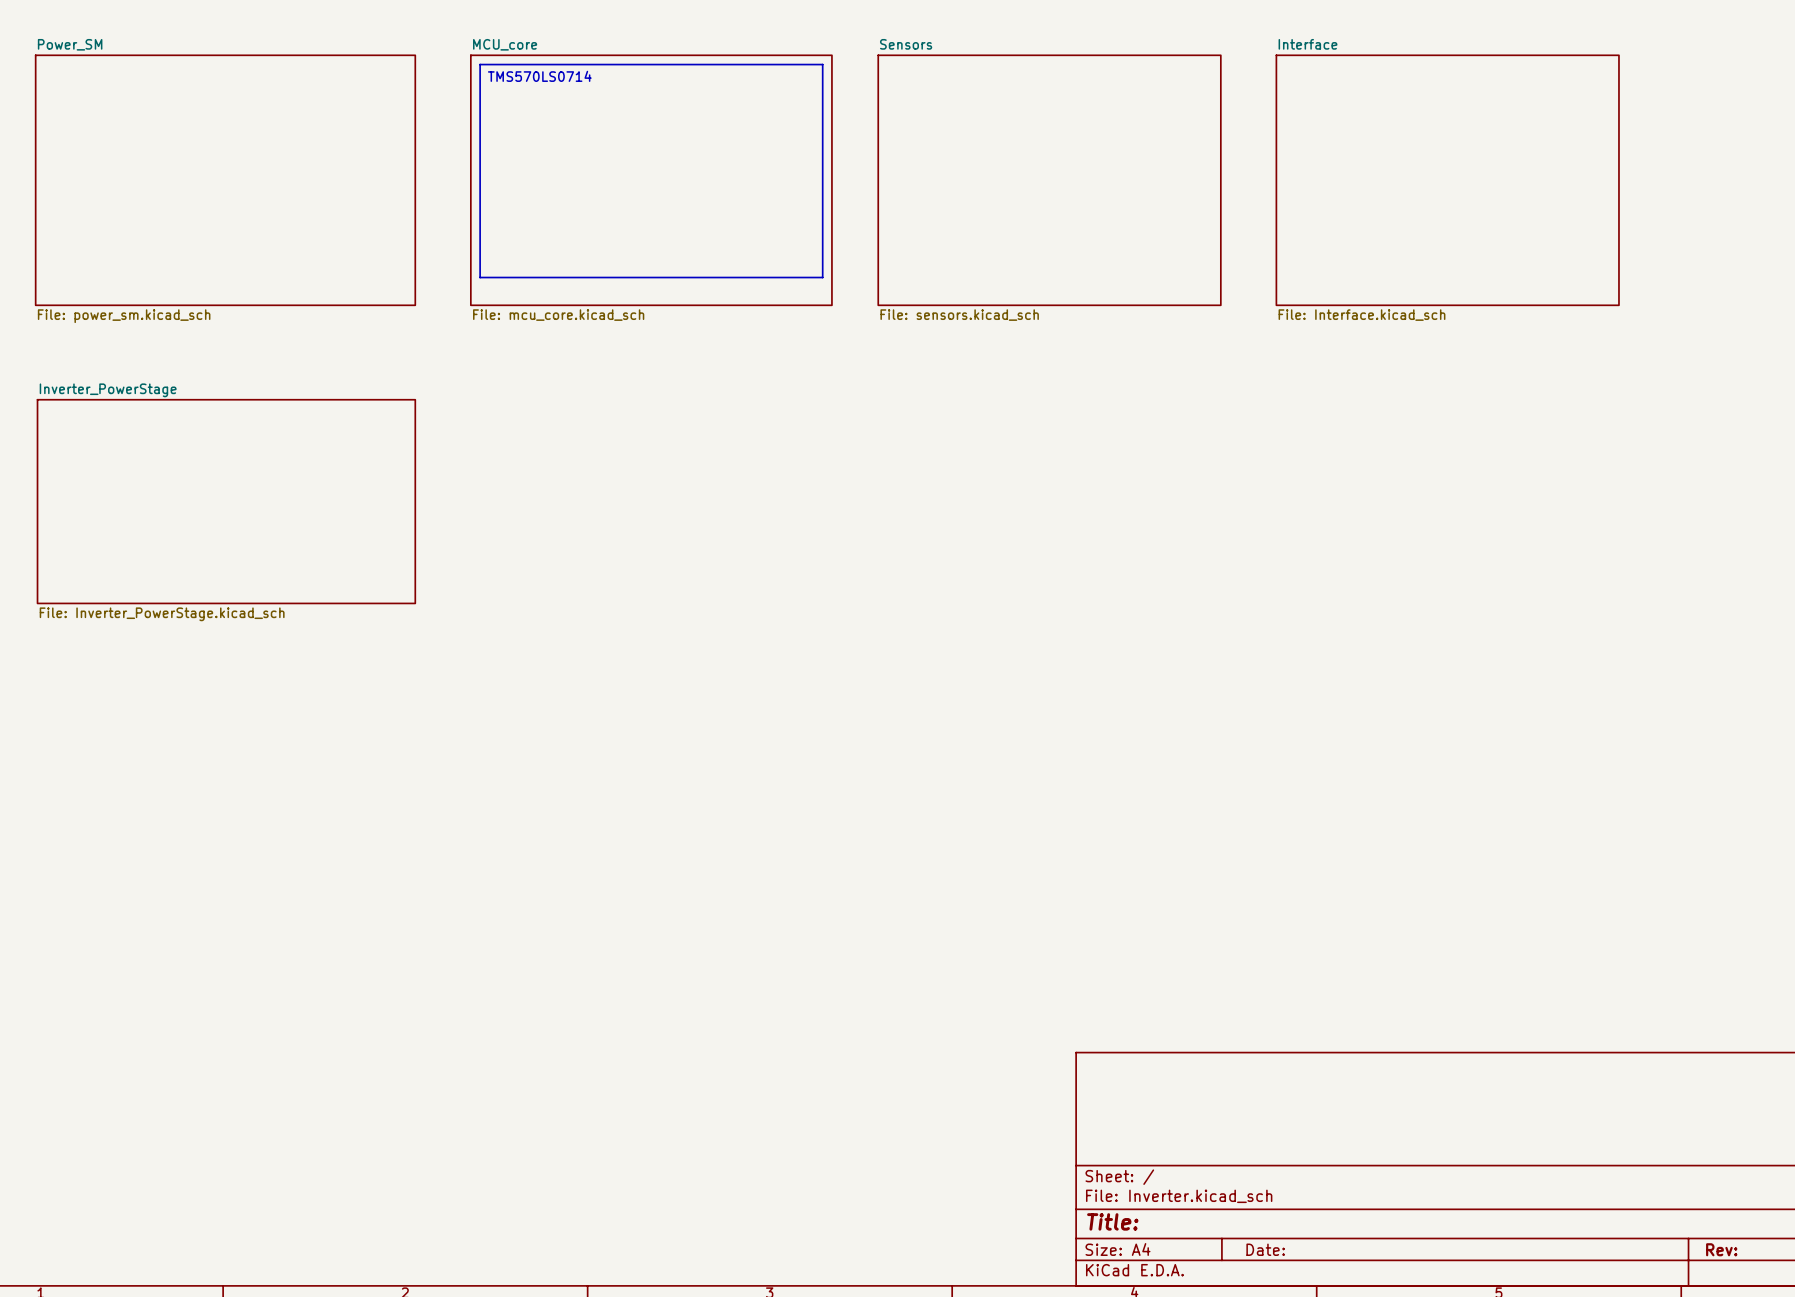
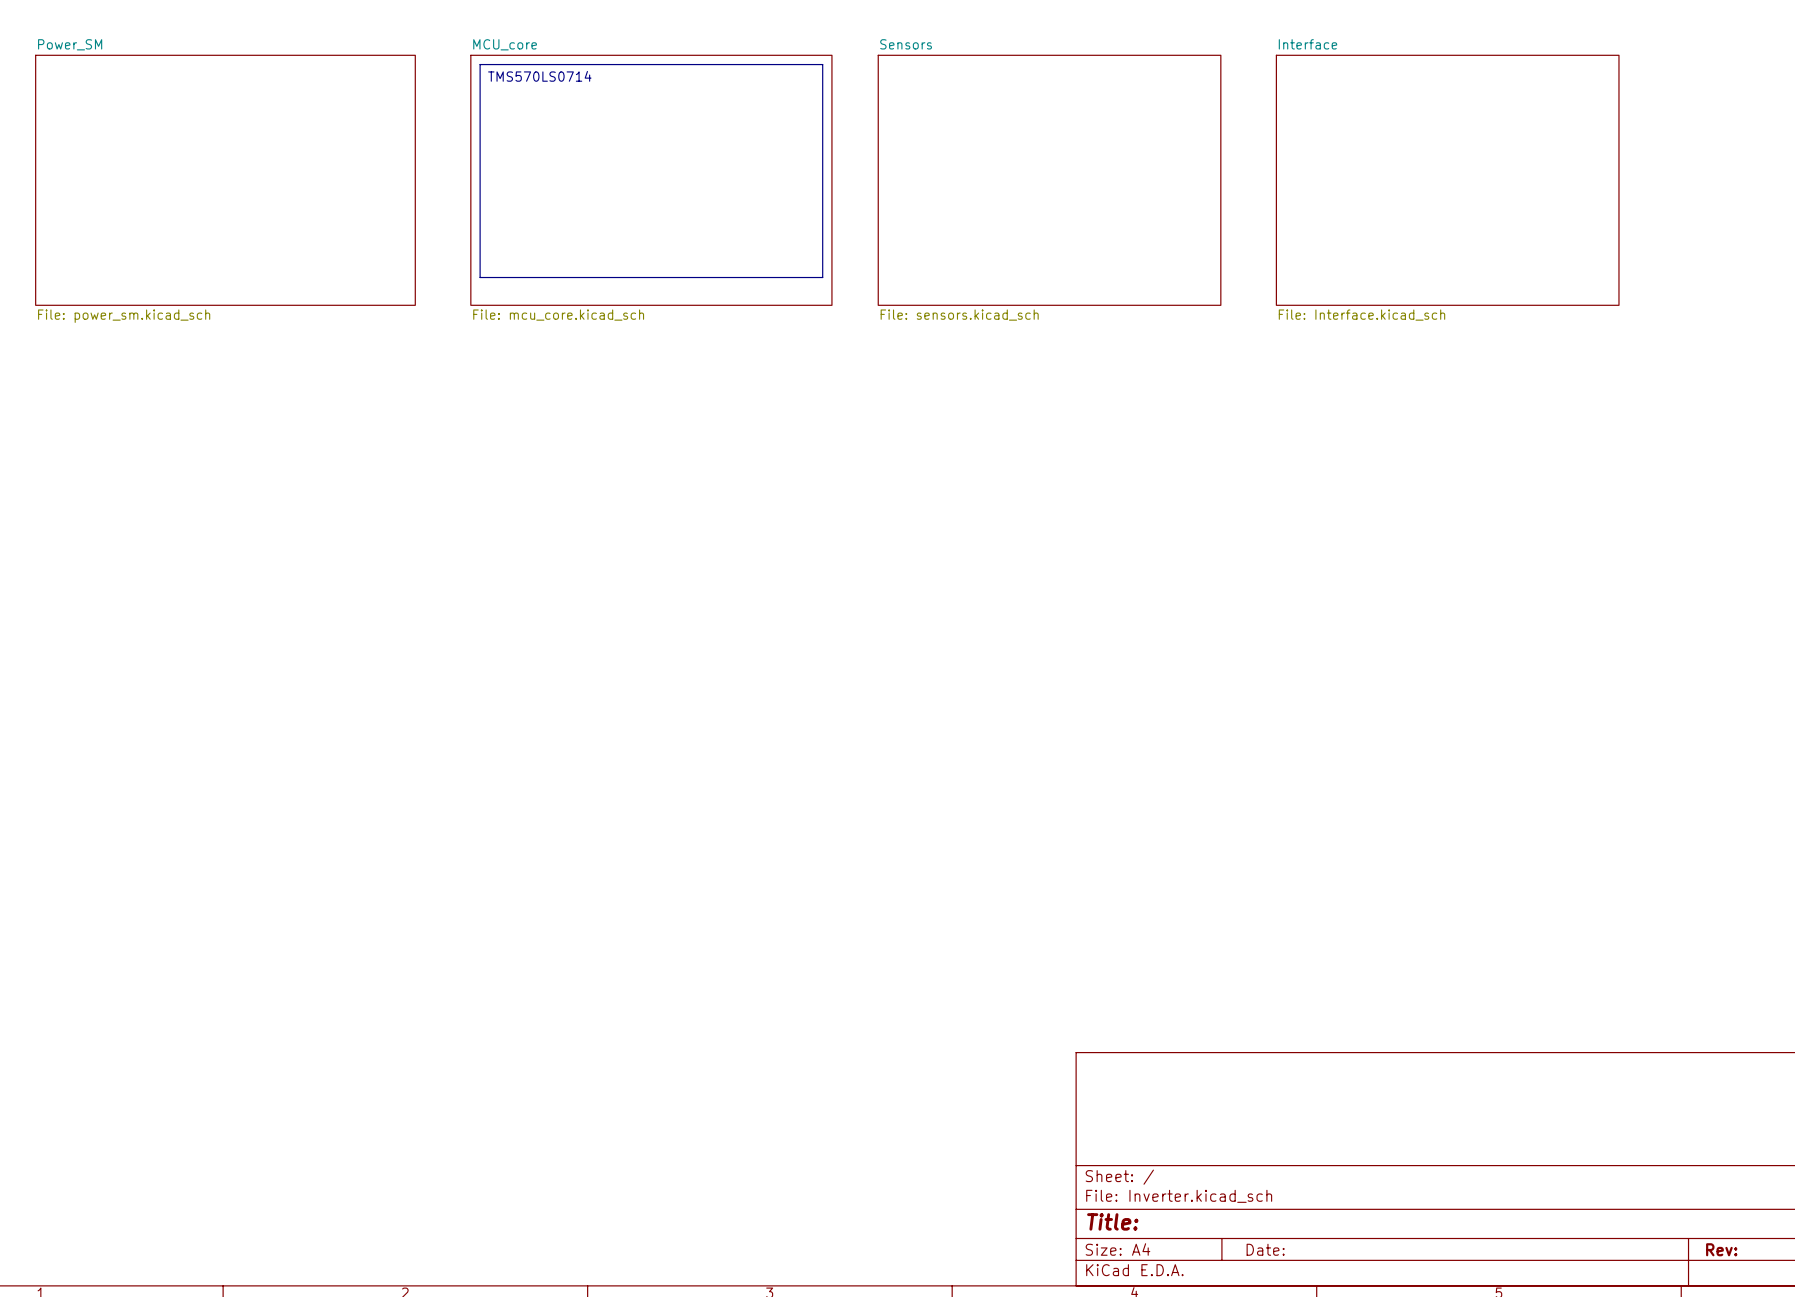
sheet Inverter_PowerStage: File: Inverter_PowerStage.kicad_sch (226, 501) -> none

